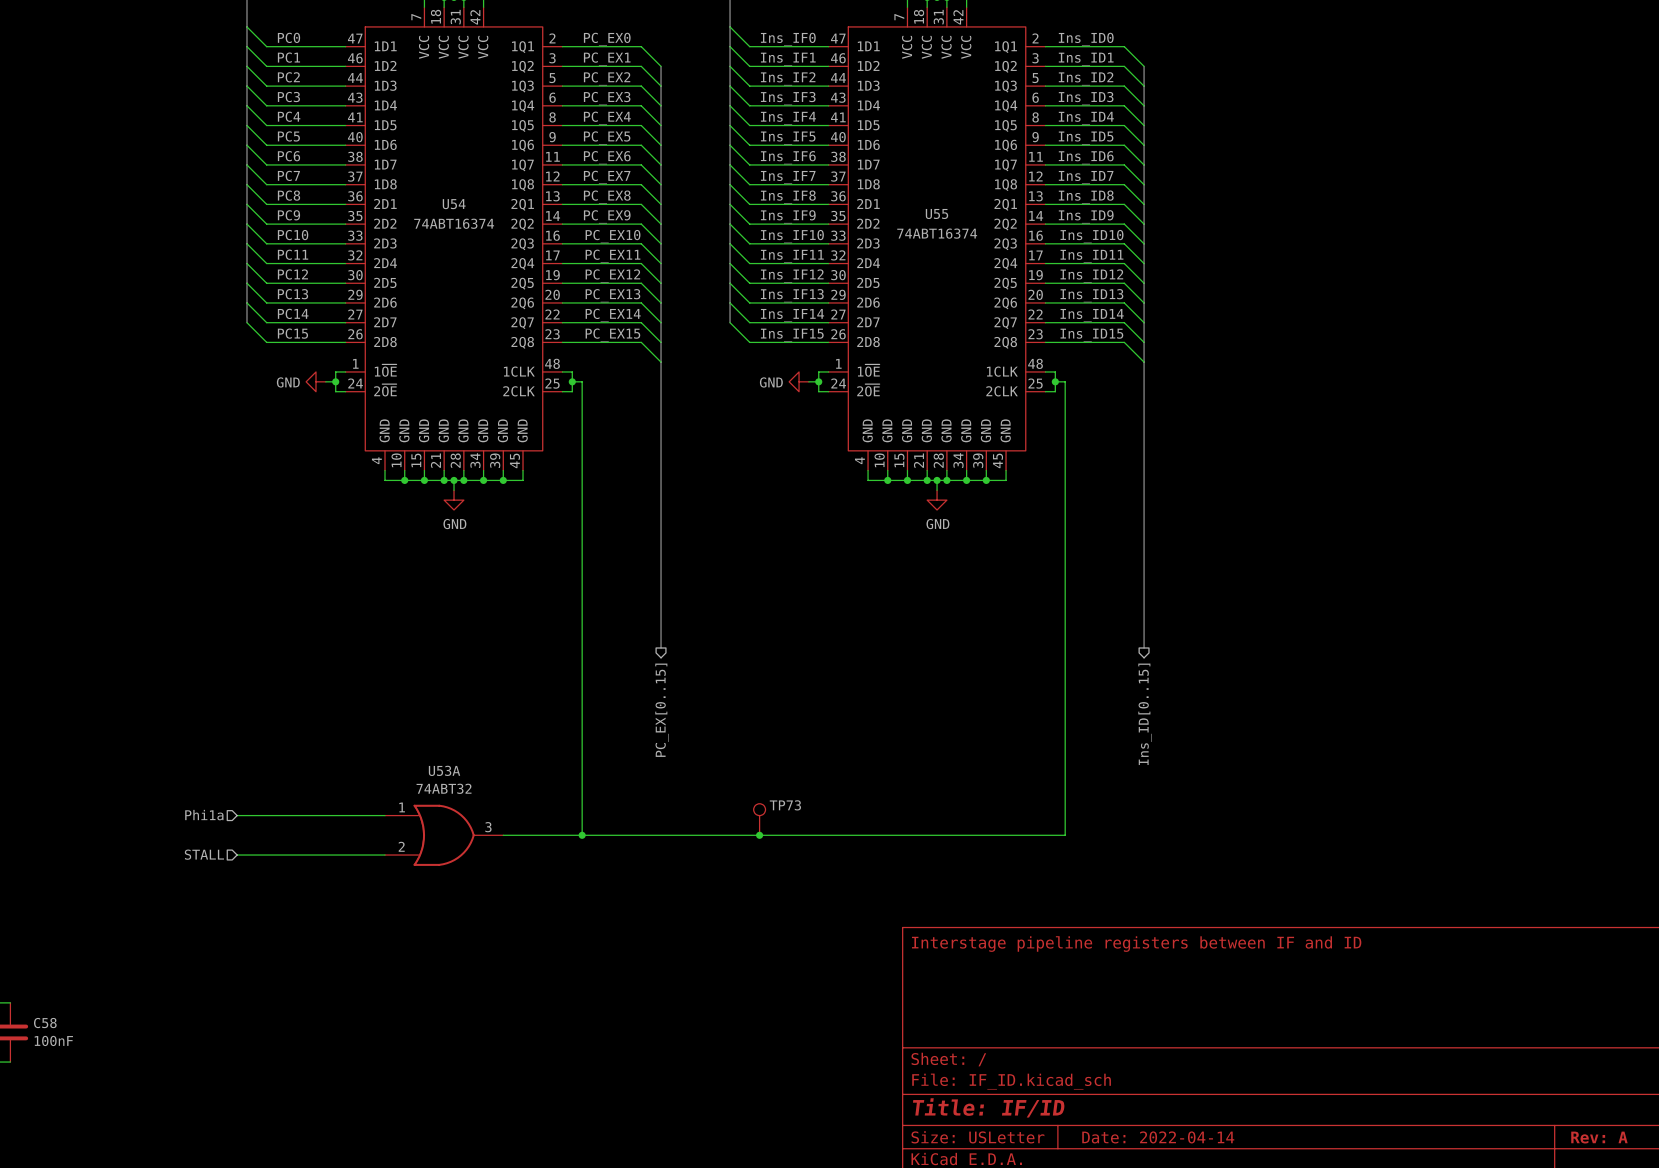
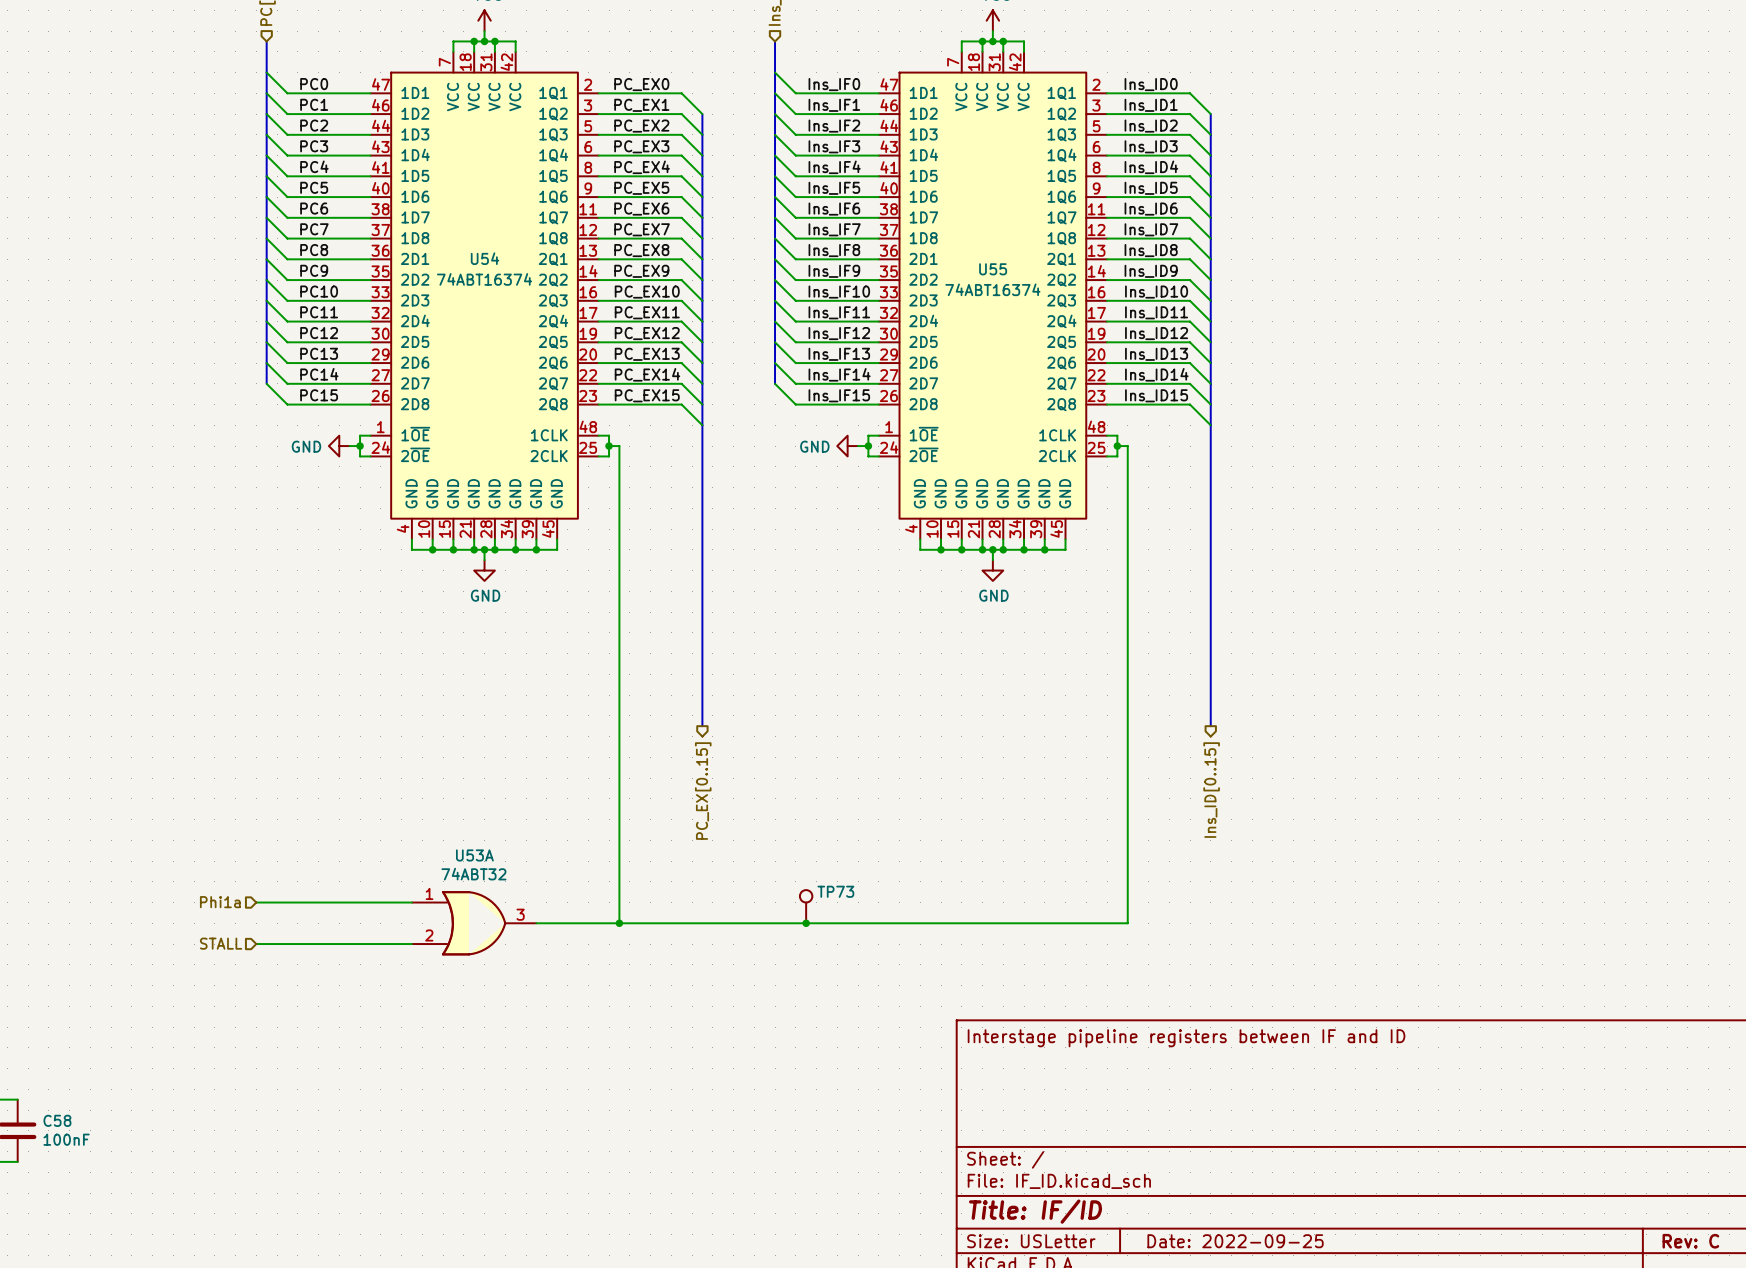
title block: Date: 2022-04-14 (1158, 1137) -> Date: 2022-09-25 (1235, 1241)
title block: Rev: A (1599, 1137) -> Rev: C (1690, 1241)

